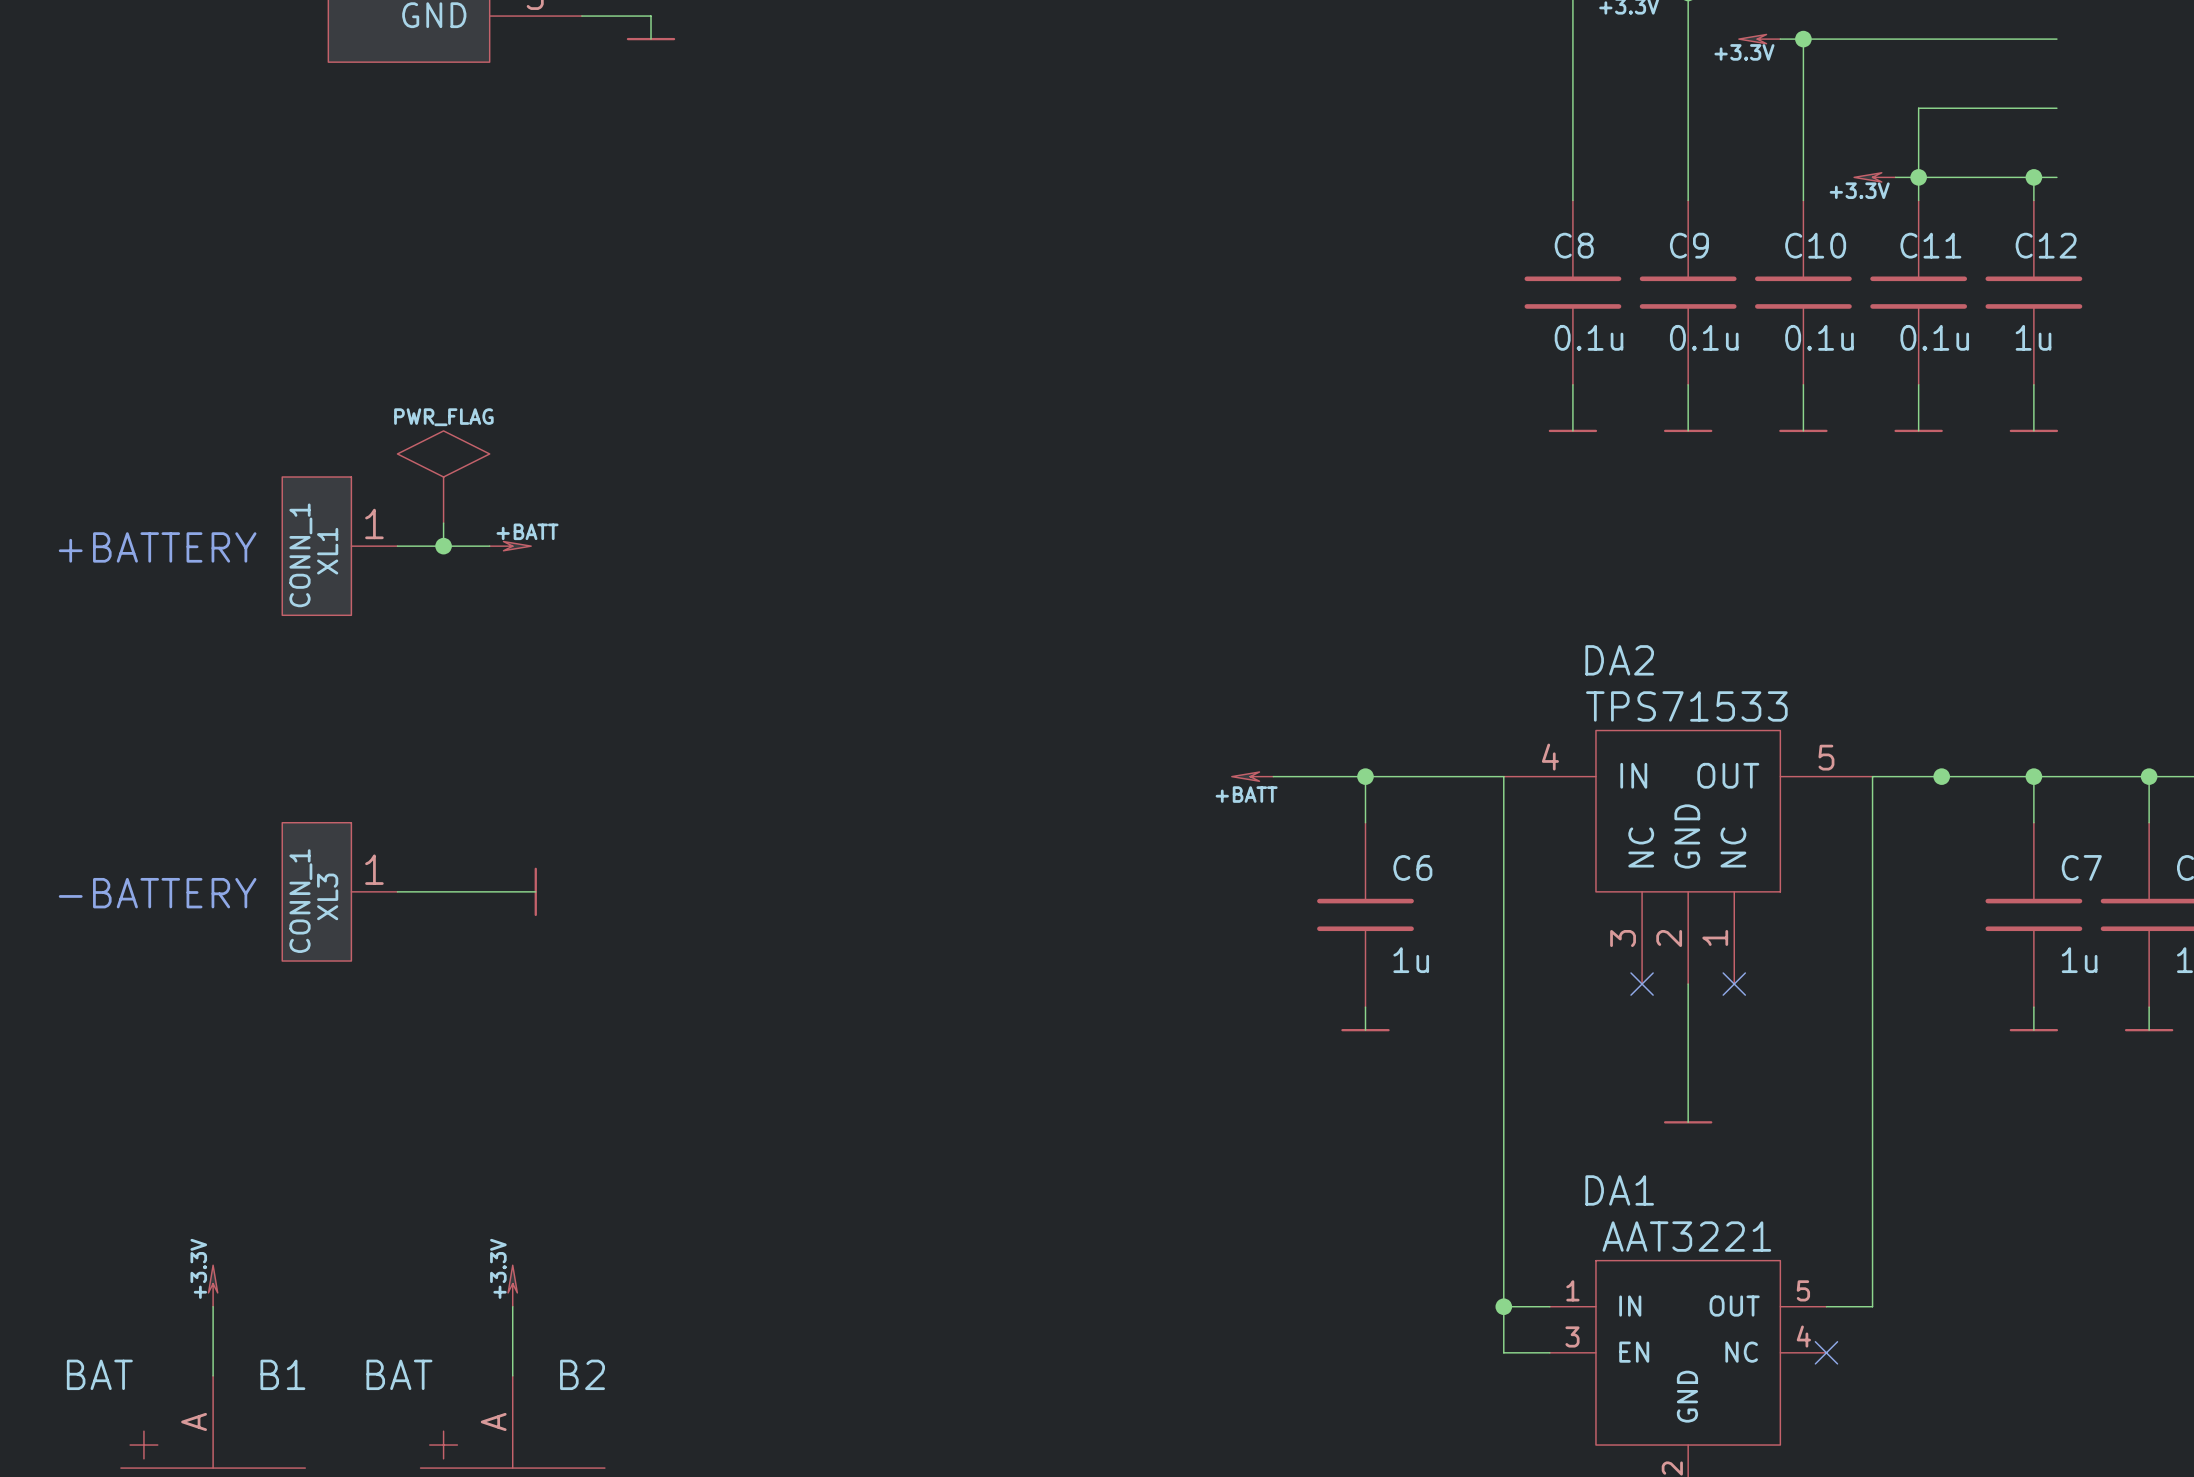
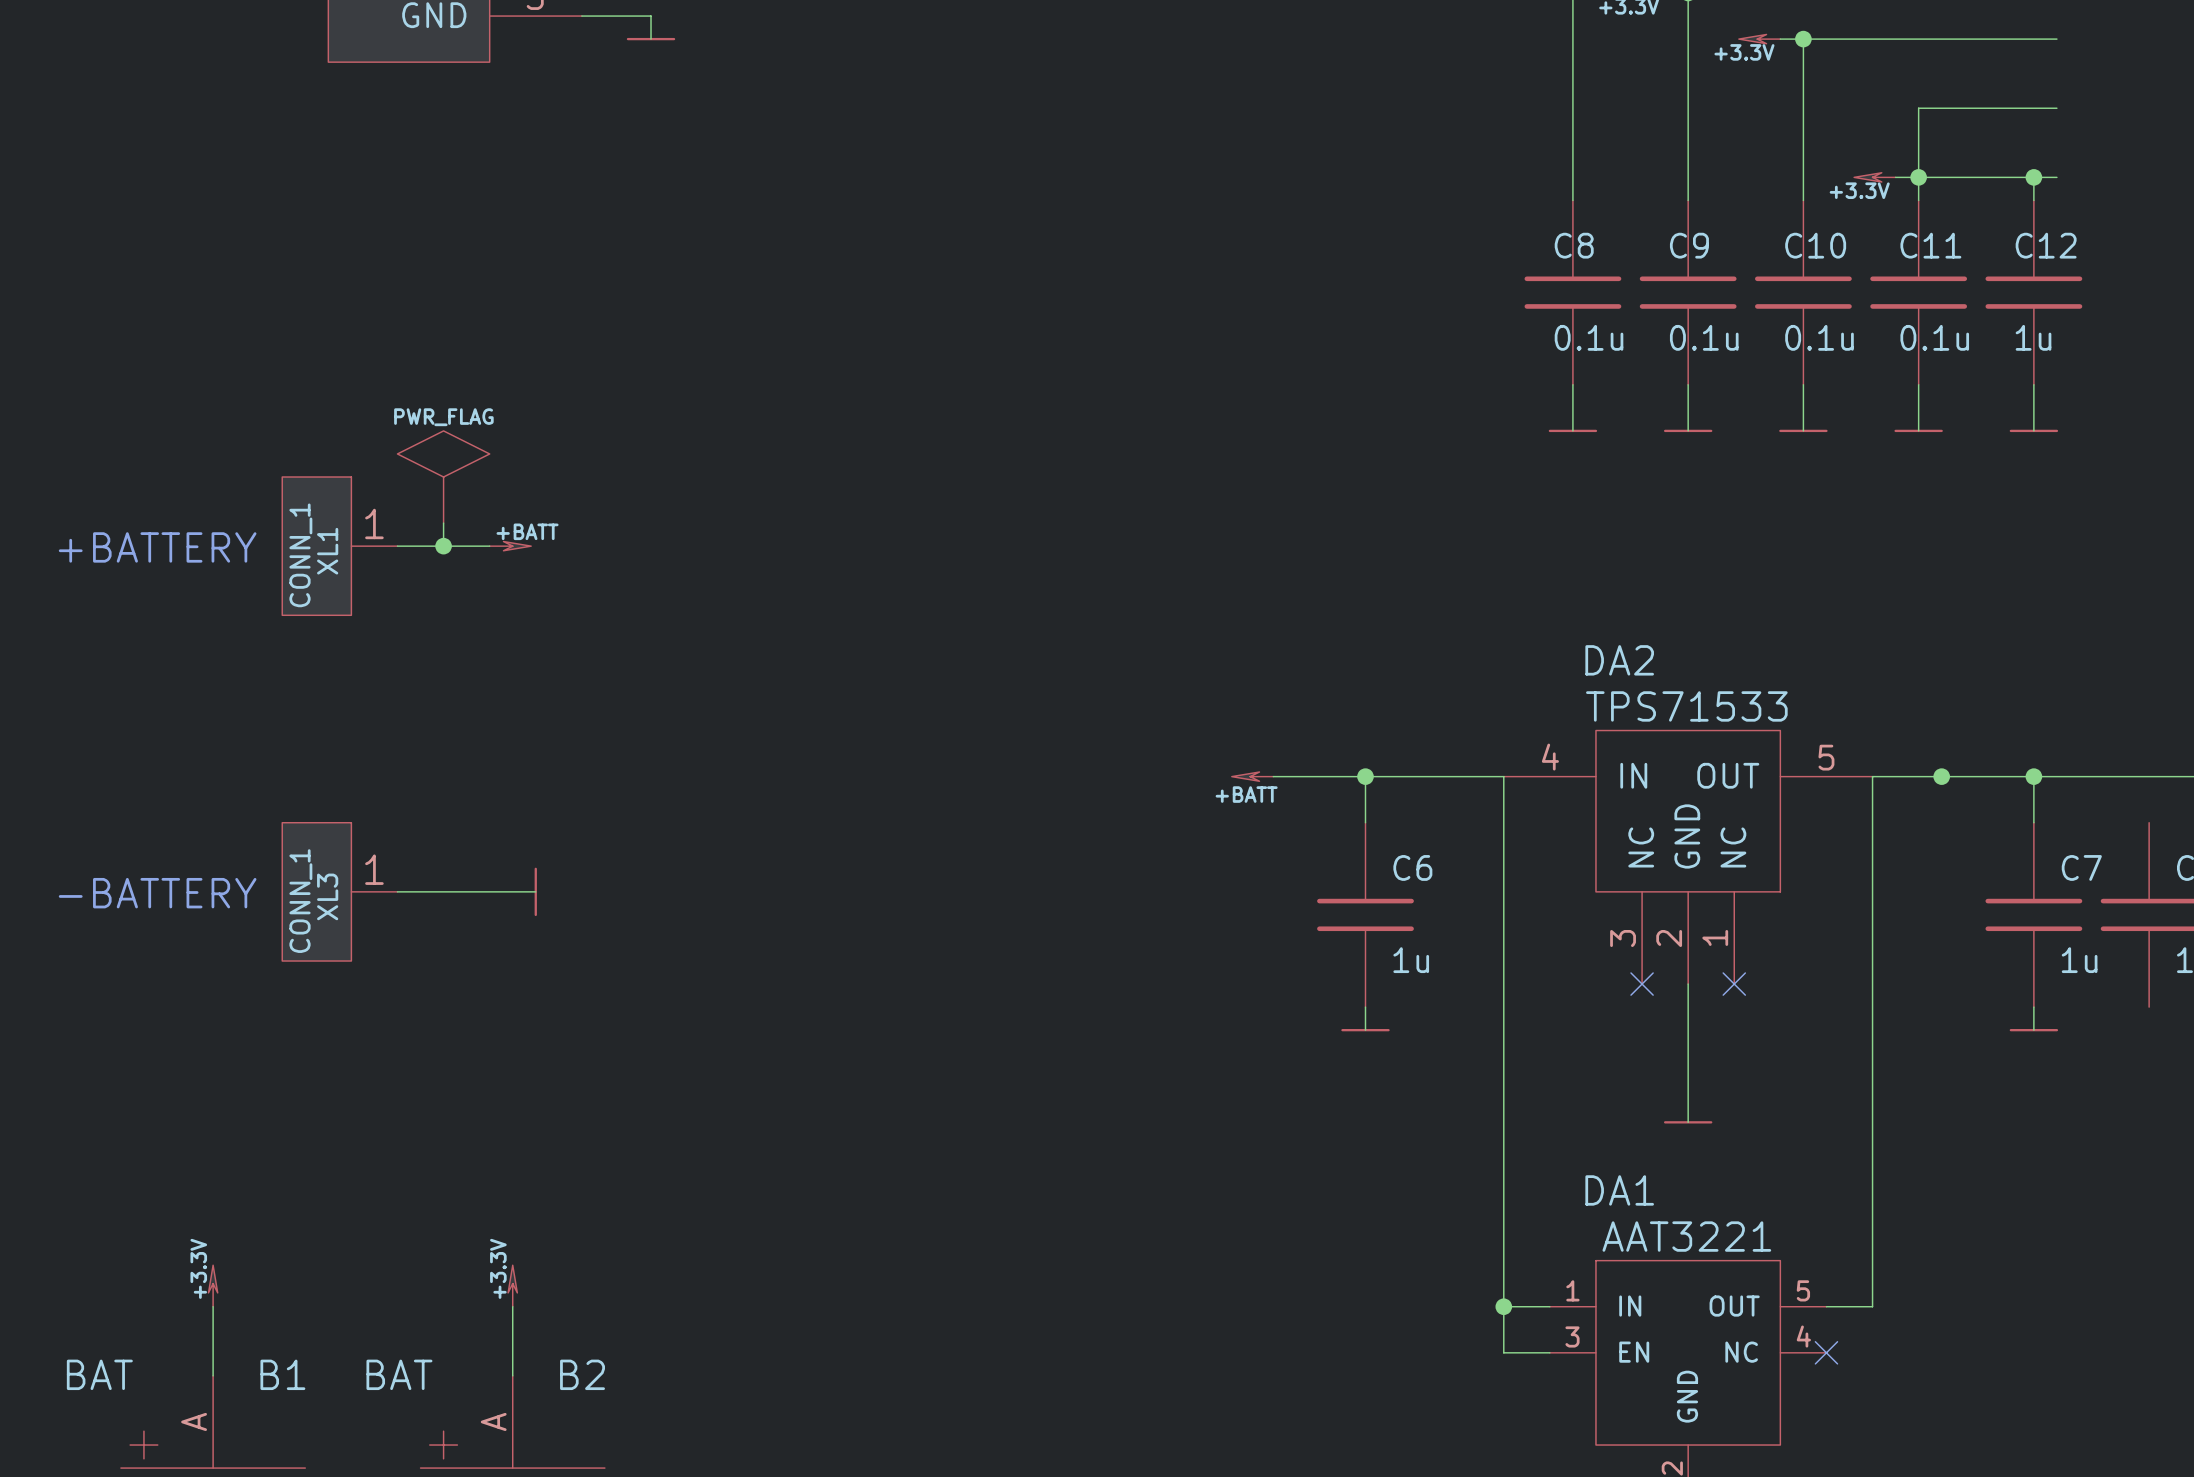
wire: (2149, 776) (2149, 822) -> none
junction: (2149, 776) -> none
wire: (2149, 1007) (2149, 1030) -> none
power symbol: (2149, 1030) -> none

